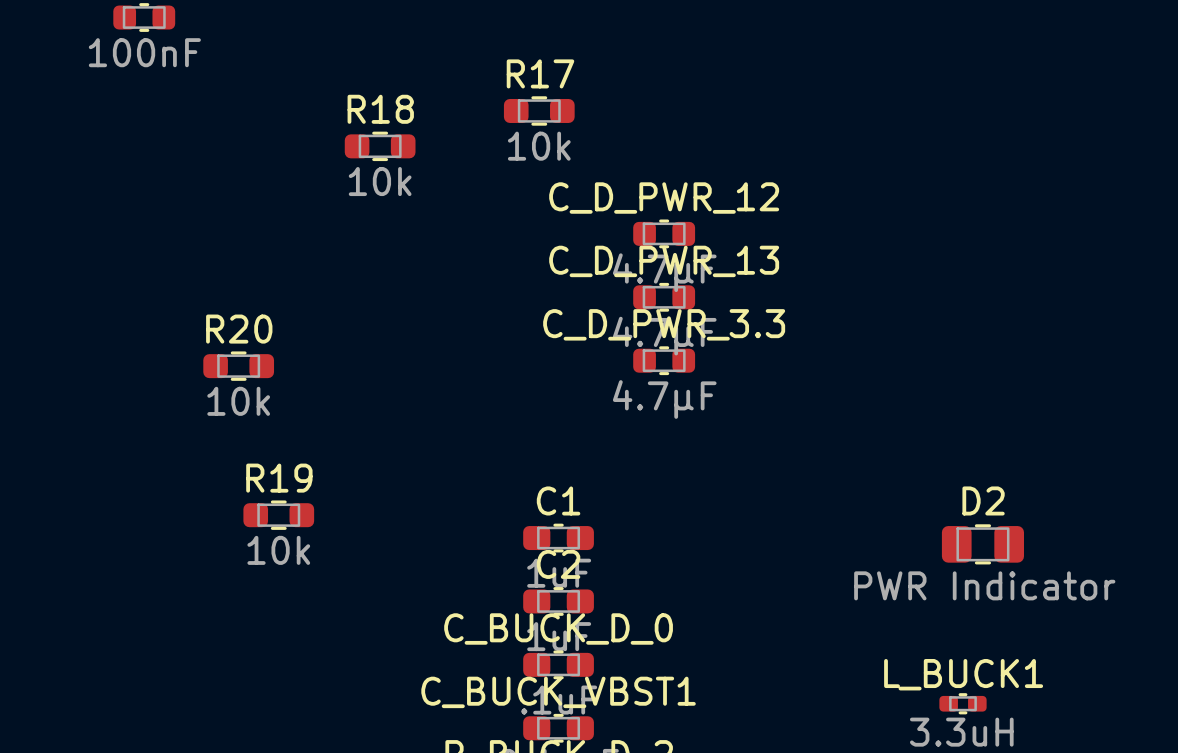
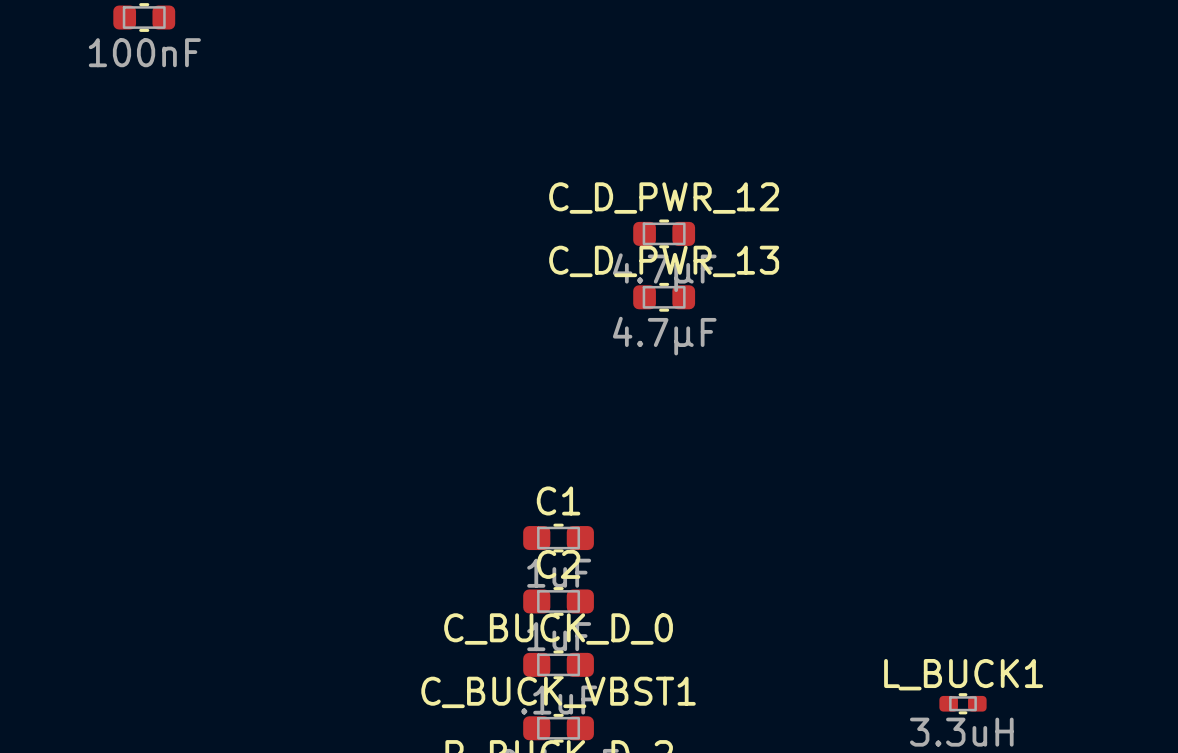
R17: 10k (539, 110) -> none
R18: 10k (380, 146) -> none
C_D_PWR_3.3: 4.7µF (664, 360) -> none
R20: 10k (238, 366) -> none
R19: 10k (278, 515) -> none
D2: PWR Indicator (982, 544) -> none

